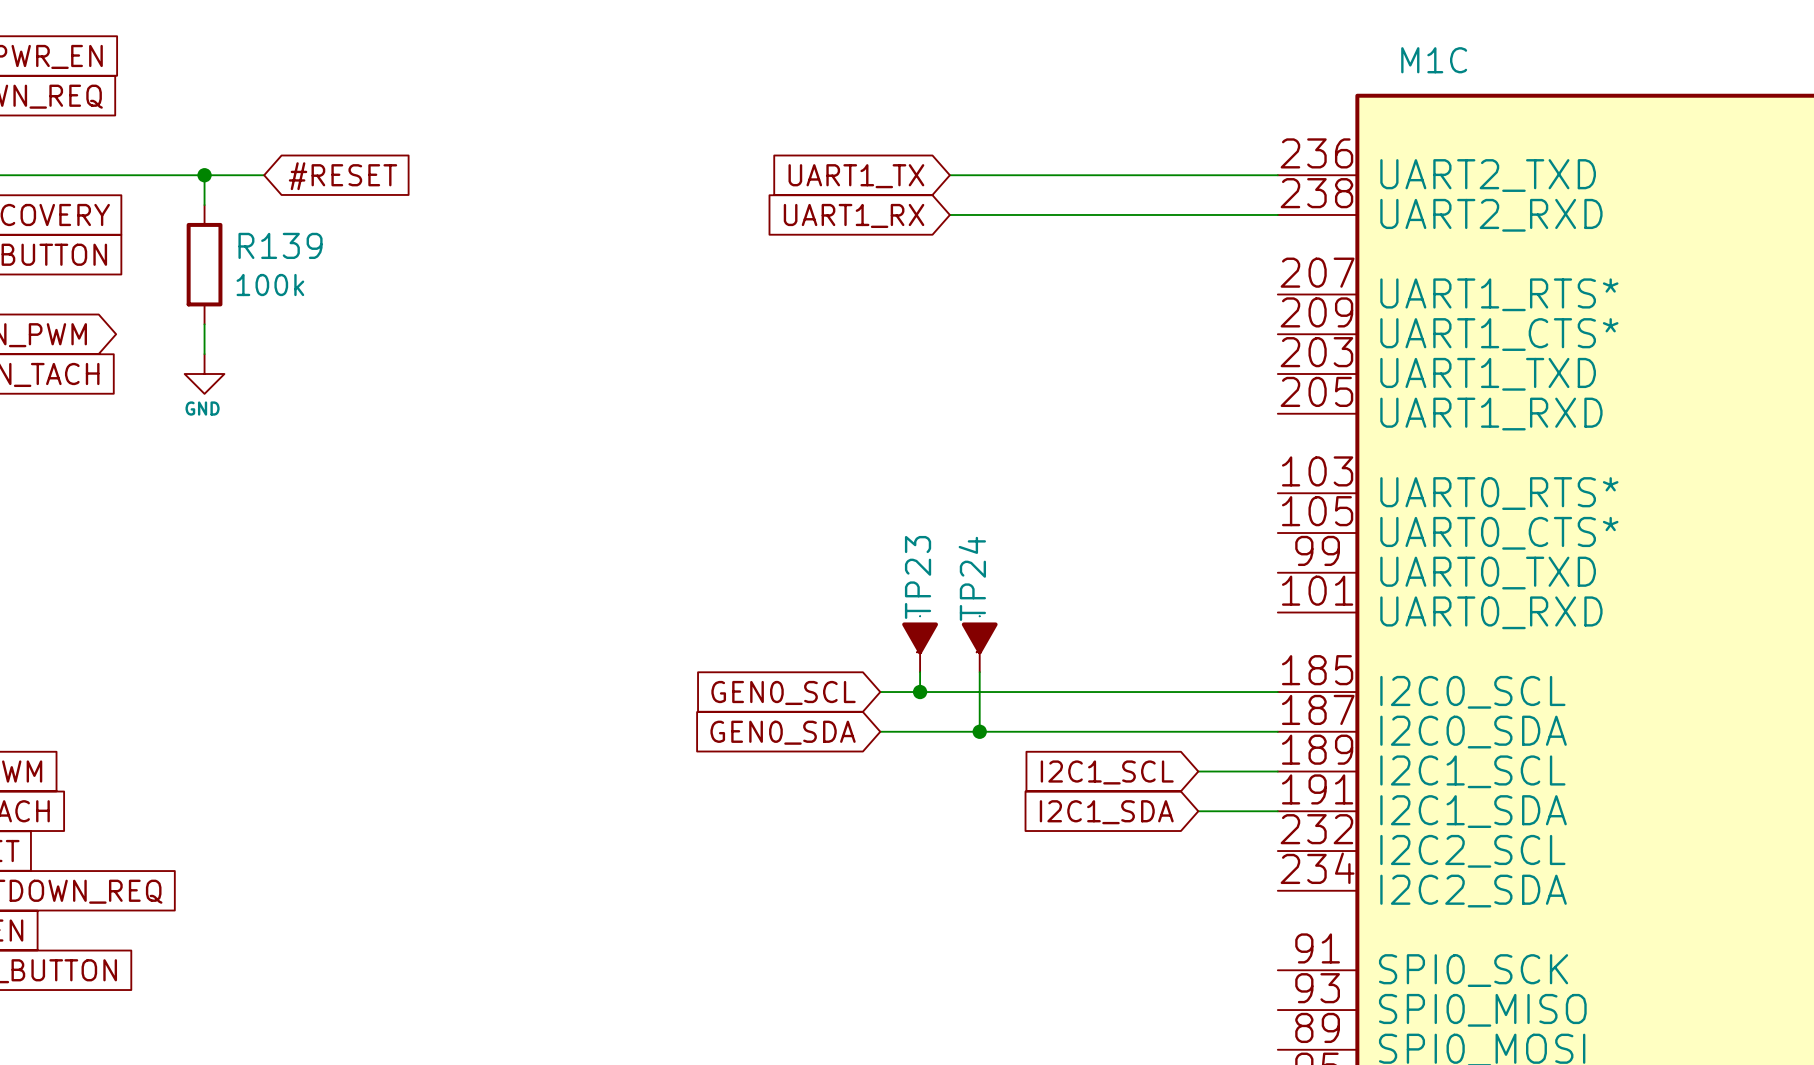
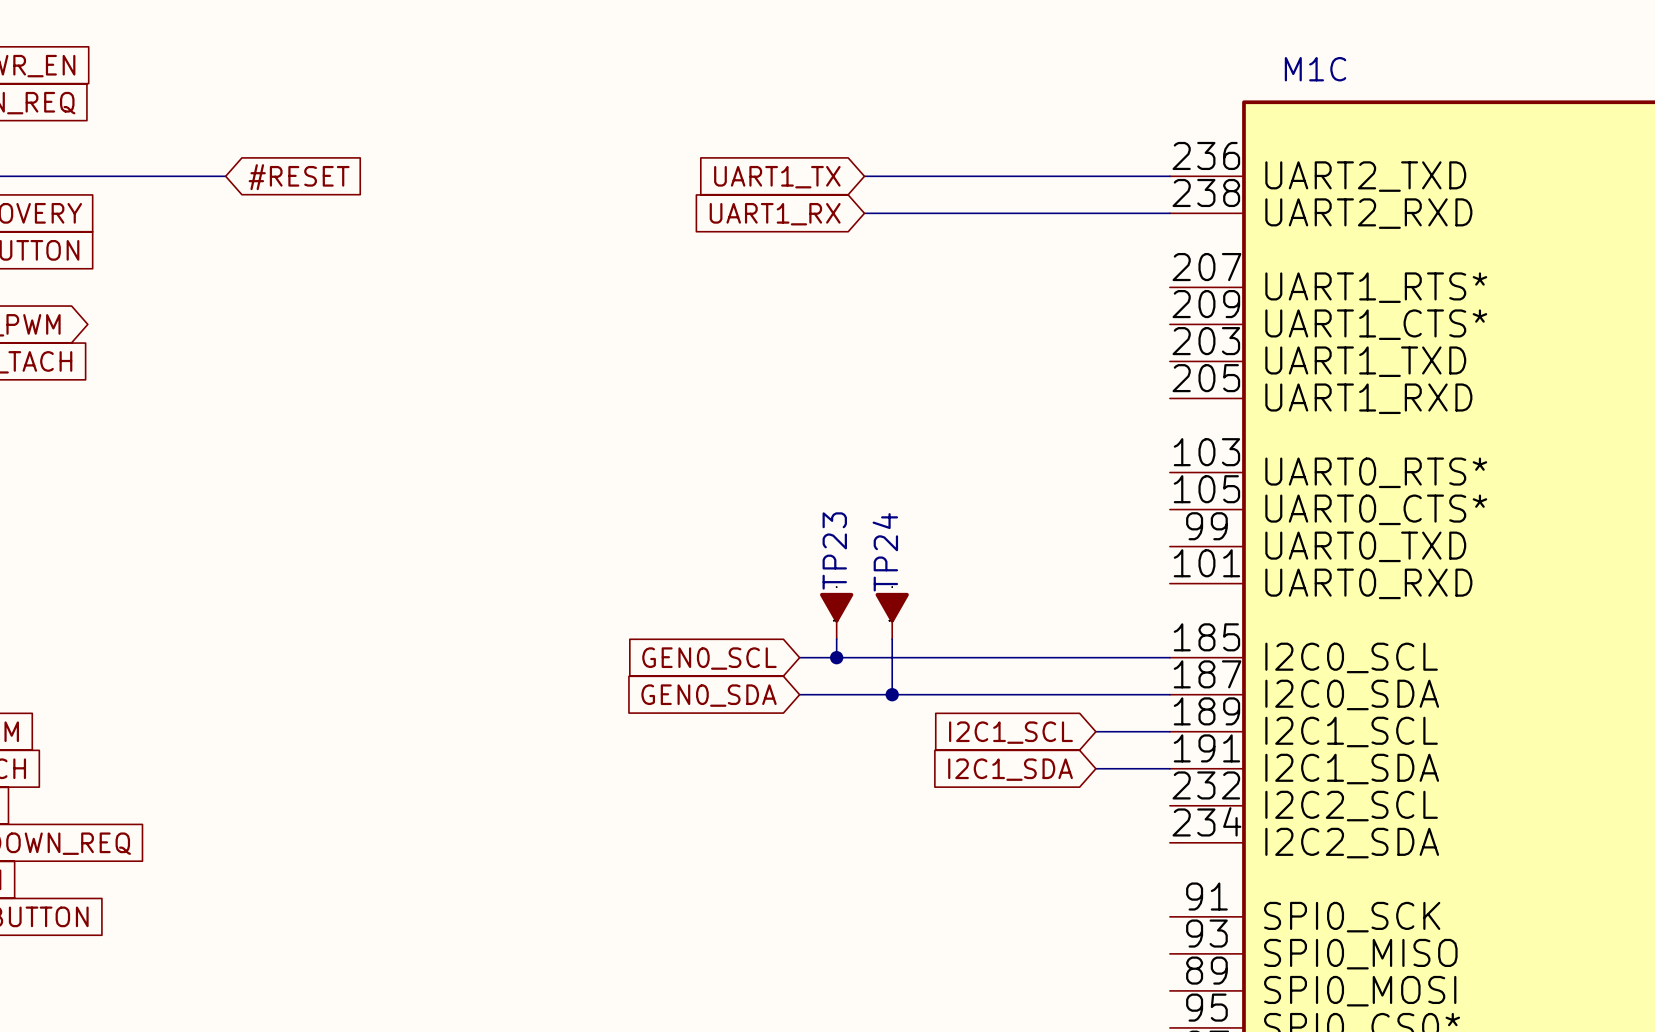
wire: (204, 175) (204, 205) -> none
junction: (204, 175) -> none
R139: (204, 264) -> none
wire: (204, 324) (204, 354) -> none
power symbol: GND (204, 374) -> none

